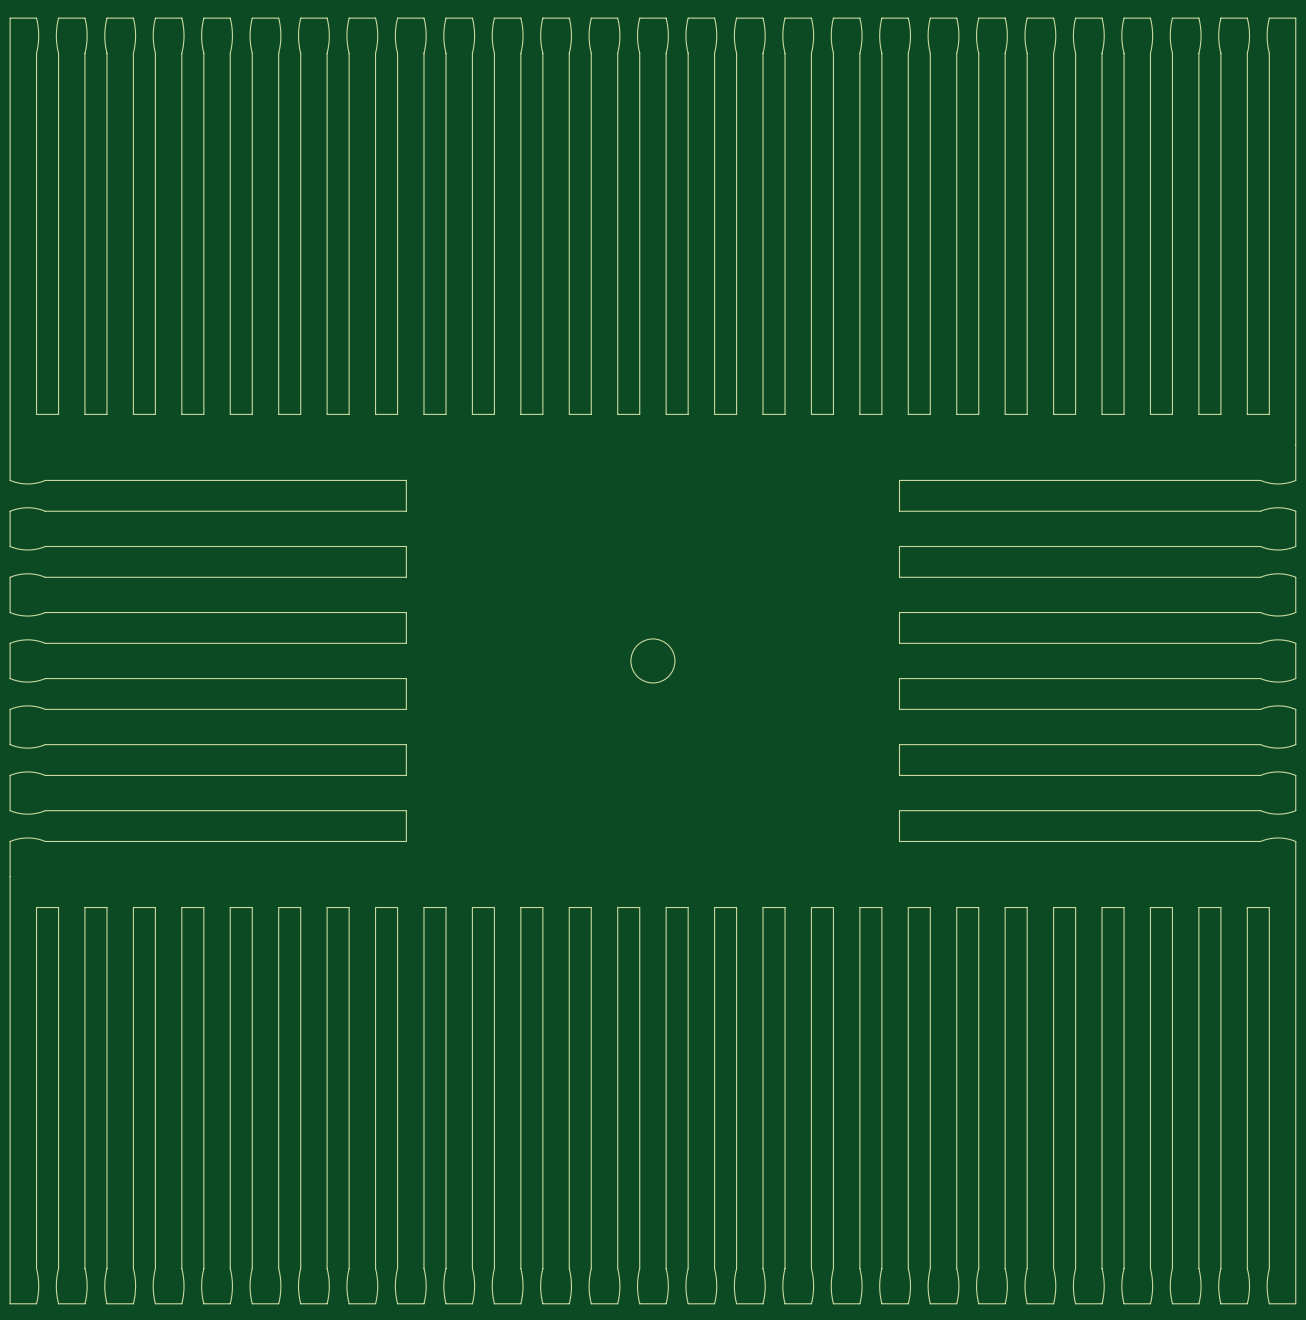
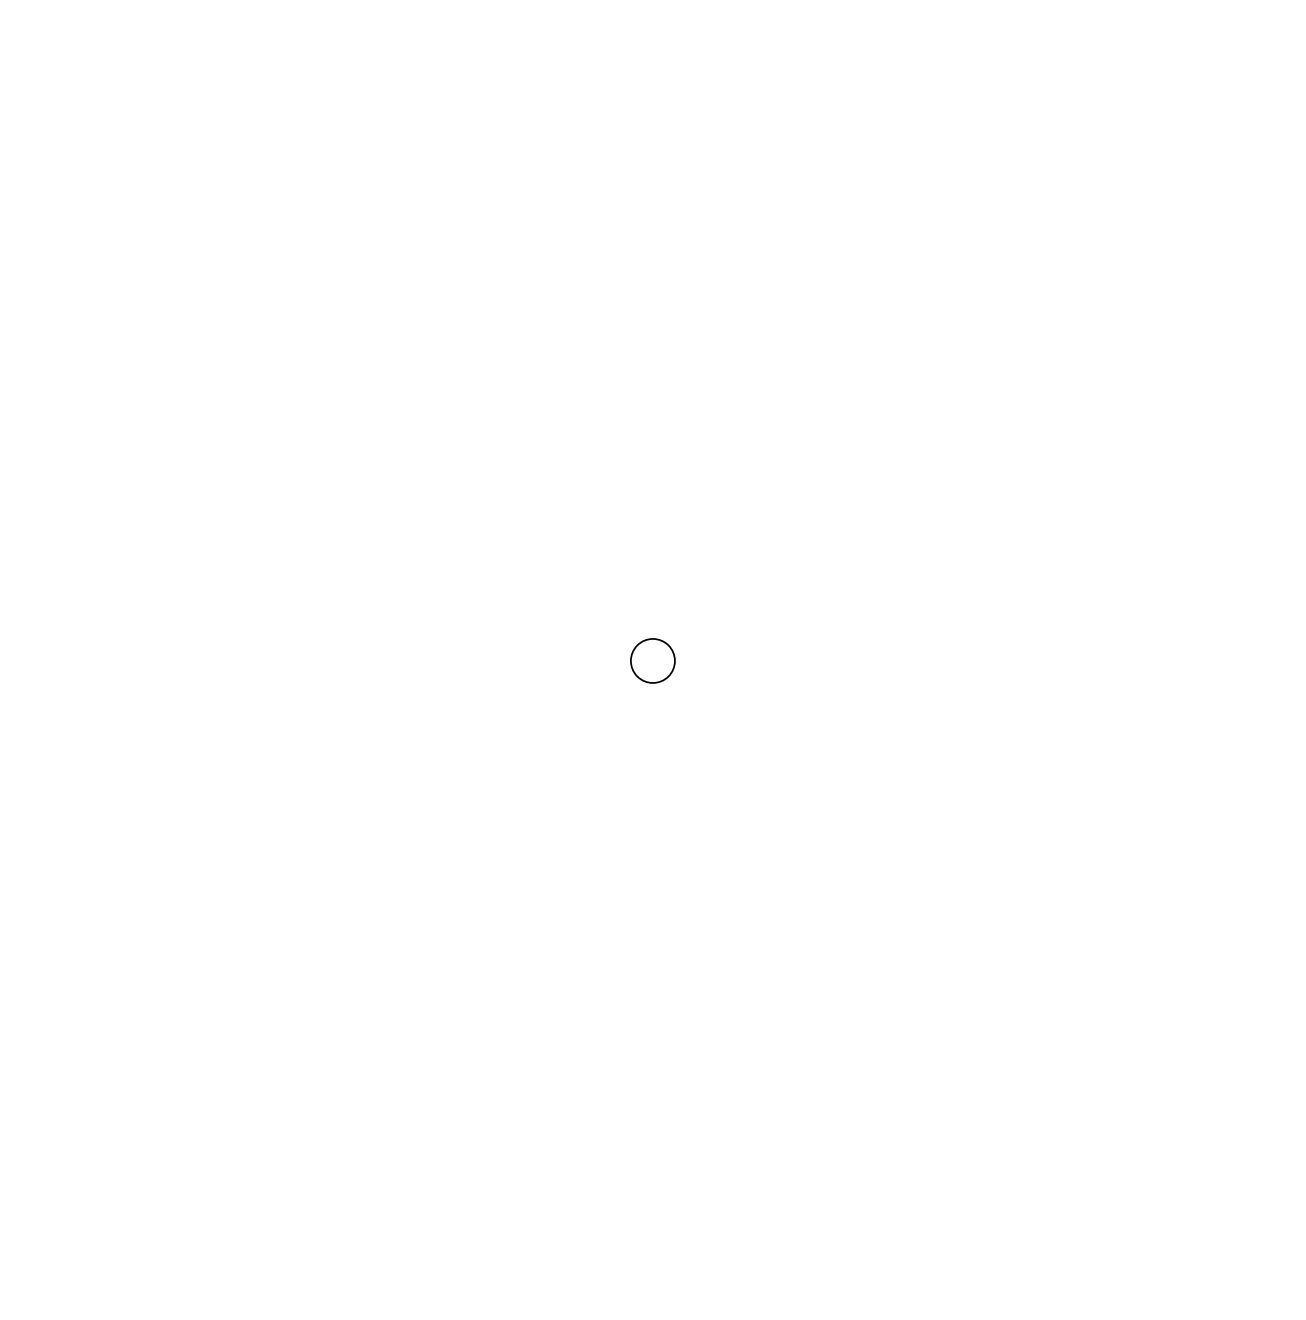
board edge: (1295, 18) (1269, 18) (1267, 31) (1269, 53) (1269, 414) (1247, 414) (1247, 53) (1249, 35) (1247, 18) (1220, 18) (1218, 31) (1220, 53) (1220, 414) (1198, 414) (1198, 53) (1201, 35) (1198, 18) (1172, 18) (1170, 31) (1172, 53) (1172, 414) (1150, 414) (1150, 53) (1152, 35) (1150, 18) (1124, 18) (1121, 31) (1124, 53) (1124, 414) (1102, 414) (1102, 53) (1104, 35) (1102, 18) (1075, 18) (1073, 31) (1075, 53) (1075, 414) (1053, 414) (1053, 53) (1055, 35) (1053, 18) (1027, 18) (1025, 31) (1027, 53) (1027, 414) (1005, 414) (1005, 53) (1007, 35) (1005, 18) (978, 18) (976, 31) (978, 53) (978, 414) (956, 414) (956, 53) (958, 35) (956, 18) (930, 18) (928, 31) (930, 53) (930, 414) (908, 414) (908, 53) (910, 35) (908, 18) (881, 18) (879, 31) (881, 53) (881, 414) (859, 414) (859, 53) (862, 35) (859, 18) (833, 18) (831, 31) (833, 53) (833, 414) (811, 414) (811, 53) (813, 35) (811, 18) (785, 18) (782, 31) (785, 53) (785, 414) (763, 414) (763, 53) (765, 35) (763, 18) (736, 18) (734, 31) (736, 53) (736, 414) (714, 414) (714, 53) (716, 35) (714, 18) (688, 18) (686, 31) (688, 53) (688, 414) (666, 414) (666, 53) (668, 35) (666, 18) (639, 18) (637, 31) (639, 53) (639, 414) (617, 414) (617, 53) (619, 35) (617, 18) (591, 18) (589, 31) (591, 53) (591, 414) (569, 414) (569, 53) (571, 35) (569, 18) (542, 18) (540, 31) (542, 53) (542, 414) (520, 414) (520, 53) (523, 35) (520, 18) (494, 18) (492, 31) (494, 53) (494, 414) (472, 414) (472, 53) (474, 35) (472, 18) (445, 18) (443, 31) (445, 53) (445, 414) (423, 414) (423, 53) (426, 35) (423, 18) (397, 18) (395, 31) (397, 53) (397, 414) (375, 414) (375, 53) (377, 35) (375, 18) (349, 18) (347, 31) (349, 53) (349, 414) (327, 414) (327, 53) (329, 35) (327, 18) (300, 18) (298, 31) (300, 53) (300, 414) (278, 414) (278, 53) (280, 35) (278, 18) (252, 18) (250, 31) (252, 53) (252, 414) (230, 414) (230, 53) (232, 35) (230, 18) (203, 18) (201, 31) (203, 53) (203, 414) (181, 414) (181, 53) (184, 35) (181, 18) (155, 18) (153, 31) (155, 53) (155, 414) (133, 414) (133, 53) (135, 35) (133, 18) (106, 18) (104, 31) (106, 53) (106, 414) (84, 414) (84, 53) (87, 35) (84, 18) (58, 18) (56, 31) (58, 53) (58, 414) (36, 414) (36, 53) (38, 26) (36, 18) (10, 18) (10, 480) (27, 483) (45, 480) (406, 480) (406, 511) (45, 511) (27, 507) (10, 511) (10, 546) (24, 549) (45, 546) (406, 546) (406, 577) (45, 577) (27, 573) (10, 577) (10, 612) (24, 615) (45, 612) (406, 612) (406, 643) (45, 643) (27, 639) (10, 643) (10, 678) (24, 681) (45, 678) (406, 678) (406, 709) (45, 709) (27, 705) (10, 709) (10, 744) (24, 747) (45, 744) (406, 744) (406, 775) (45, 775) (27, 771) (10, 775) (10, 810) (24, 814) (45, 810) (406, 810) (406, 841) (45, 841) (27, 837) (10, 841) (10, 1303) (36, 1303) (38, 1290) (36, 1268) (36, 907) (58, 907) (58, 1268) (56, 1286) (58, 1303) (84, 1303) (87, 1290) (84, 1268) (84, 907) (106, 907) (106, 1268) (104, 1286) (106, 1303) (133, 1303) (135, 1290) (133, 1268) (133, 907) (155, 907) (155, 1268) (153, 1286) (155, 1303) (181, 1303) (183, 1290) (181, 1268) (181, 907) (203, 907) (203, 1268) (201, 1286) (203, 1303) (230, 1303) (232, 1290) (230, 1268) (230, 907) (252, 907) (252, 1268) (250, 1286) (252, 1303) (278, 1303) (280, 1290) (278, 1268) (278, 907) (300, 907) (300, 1268) (298, 1286) (300, 1303) (327, 1303) (329, 1290) (327, 1268) (327, 907) (349, 907) (349, 1268) (346, 1286) (349, 1303) (375, 1303) (377, 1290) (375, 1268) (375, 907) (397, 907) (397, 1268) (395, 1286) (397, 1303) (423, 1303) (426, 1290) (423, 1268) (423, 907) (445, 907) (445, 1268) (443, 1286) (445, 1303) (472, 1303) (474, 1290) (472, 1268) (472, 907) (494, 907) (494, 1268) (492, 1286) (494, 1303) (520, 1303) (522, 1290) (520, 1268) (520, 907) (542, 907) (542, 1268) (540, 1286) (542, 1303) (569, 1303) (571, 1290) (569, 1268) (569, 907) (591, 907) (591, 1268) (589, 1286) (591, 1303) (617, 1303) (619, 1290) (617, 1268) (617, 907) (639, 907) (639, 1268) (637, 1286) (639, 1303) (666, 1303) (668, 1290) (666, 1268) (666, 907) (688, 907) (688, 1268) (685, 1286) (688, 1303) (714, 1303) (716, 1290) (714, 1268) (714, 907) (736, 907) (736, 1268) (734, 1286) (736, 1303) (763, 1303) (765, 1290) (763, 1268) (763, 907) (785, 907) (785, 1268) (782, 1286) (785, 1303) (811, 1303) (813, 1290) (811, 1268) (811, 907) (833, 907) (833, 1268) (831, 1286) (833, 1303) (859, 1303) (861, 1290) (859, 1268) (859, 907) (881, 907) (881, 1268) (879, 1286) (881, 1303) (908, 1303) (910, 1290) (908, 1268) (908, 907) (930, 907) (930, 1268) (928, 1286) (930, 1303) (956, 1303) (958, 1290) (956, 1268) (956, 907) (978, 907) (978, 1268) (976, 1286) (978, 1303) (1005, 1303) (1007, 1290) (1005, 1268) (1005, 907) (1027, 907) (1027, 1268) (1024, 1286) (1027, 1303) (1053, 1303) (1055, 1290) (1053, 1268) (1053, 907) (1075, 907) (1075, 1268) (1073, 1286) (1075, 1303) (1102, 1303) (1104, 1290) (1102, 1268) (1102, 907) (1124, 907) (1124, 1268) (1121, 1286) (1124, 1303) (1150, 1303) (1152, 1290) (1150, 1268) (1150, 907) (1172, 907) (1172, 1268) (1170, 1286) (1172, 1303) (1198, 1303) (1200, 1290) (1198, 1268) (1198, 907) (1220, 907) (1220, 1268) (1218, 1286) (1220, 1303) (1247, 1303) (1249, 1290) (1247, 1268) (1247, 907) (1269, 907) (1269, 1268) (1267, 1295) (1269, 1303) (1295, 1303) (1295, 841) (1278, 837) (1260, 841) (899, 841) (899, 810) (1260, 810) (1278, 814) (1295, 810) (1295, 775) (1281, 772) (1260, 775) (899, 775) (899, 744) (1260, 744) (1278, 748) (1295, 744) (1295, 709) (1281, 706) (1260, 709) (899, 709) (899, 678) (1260, 678) (1278, 682) (1295, 678) (1295, 643) (1281, 639) (1260, 643) (899, 643) (899, 612) (1260, 612) (1278, 616) (1295, 612) (1295, 577) (1281, 573) (1260, 577) (899, 577) (899, 546) (1260, 546) (1278, 550) (1295, 546) (1295, 511) (1281, 507) (1260, 511) (899, 511) (899, 480) (1260, 480) (1278, 483) (1295, 480) (1295, 18) -> none

